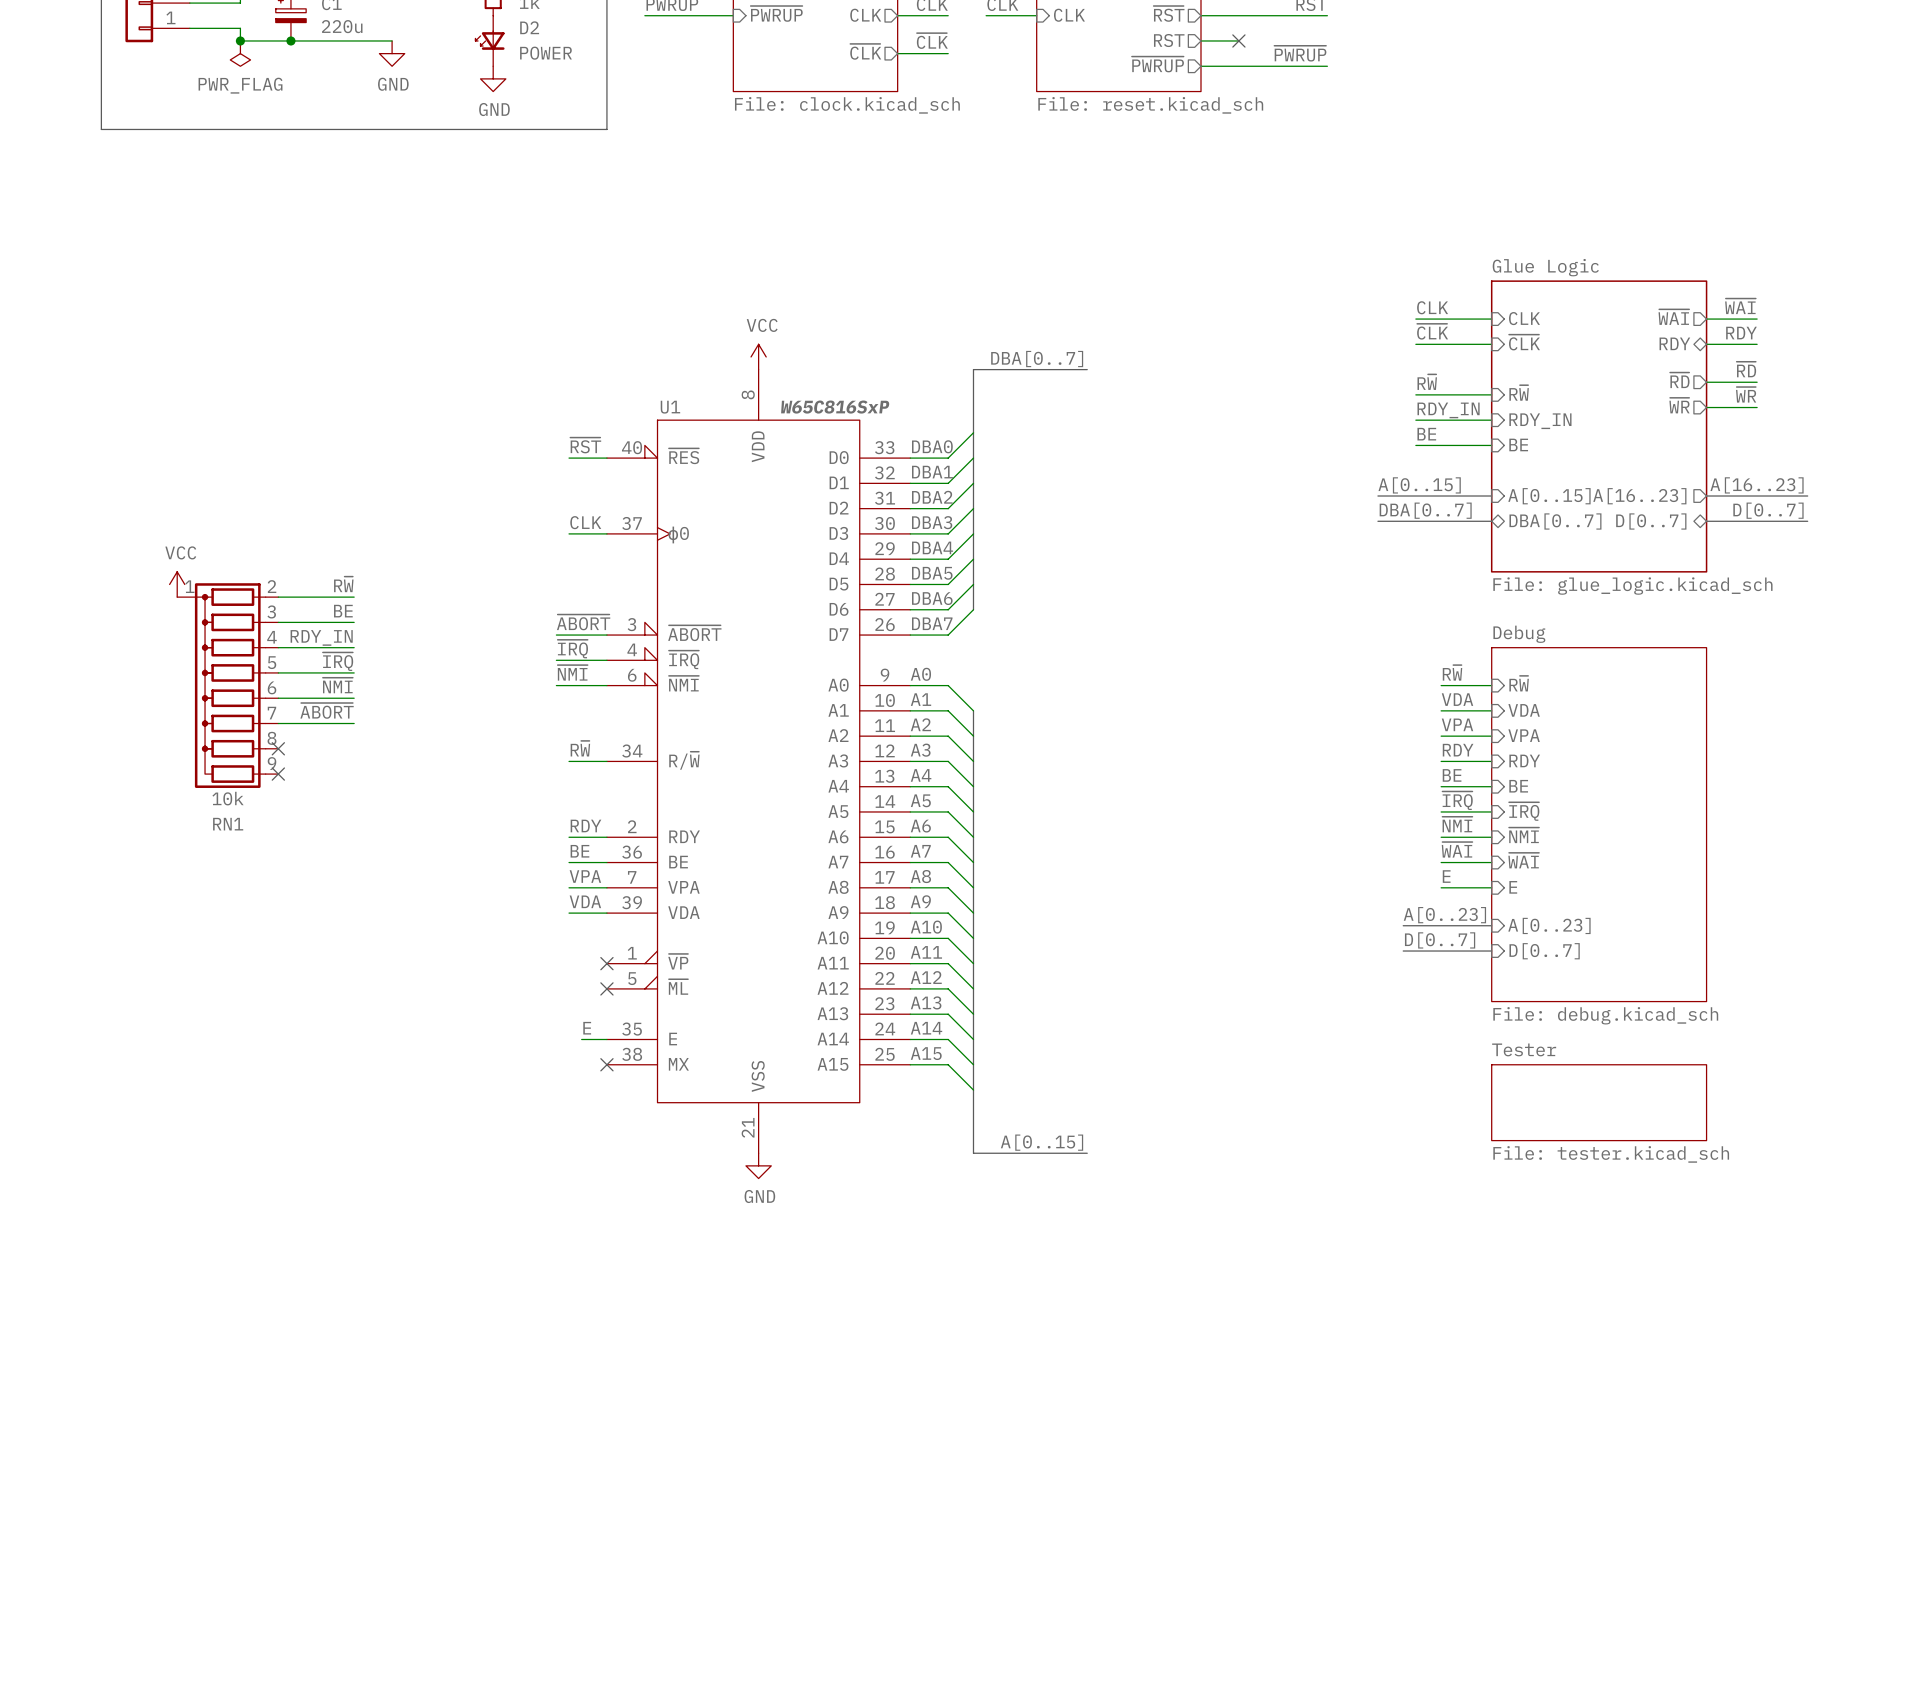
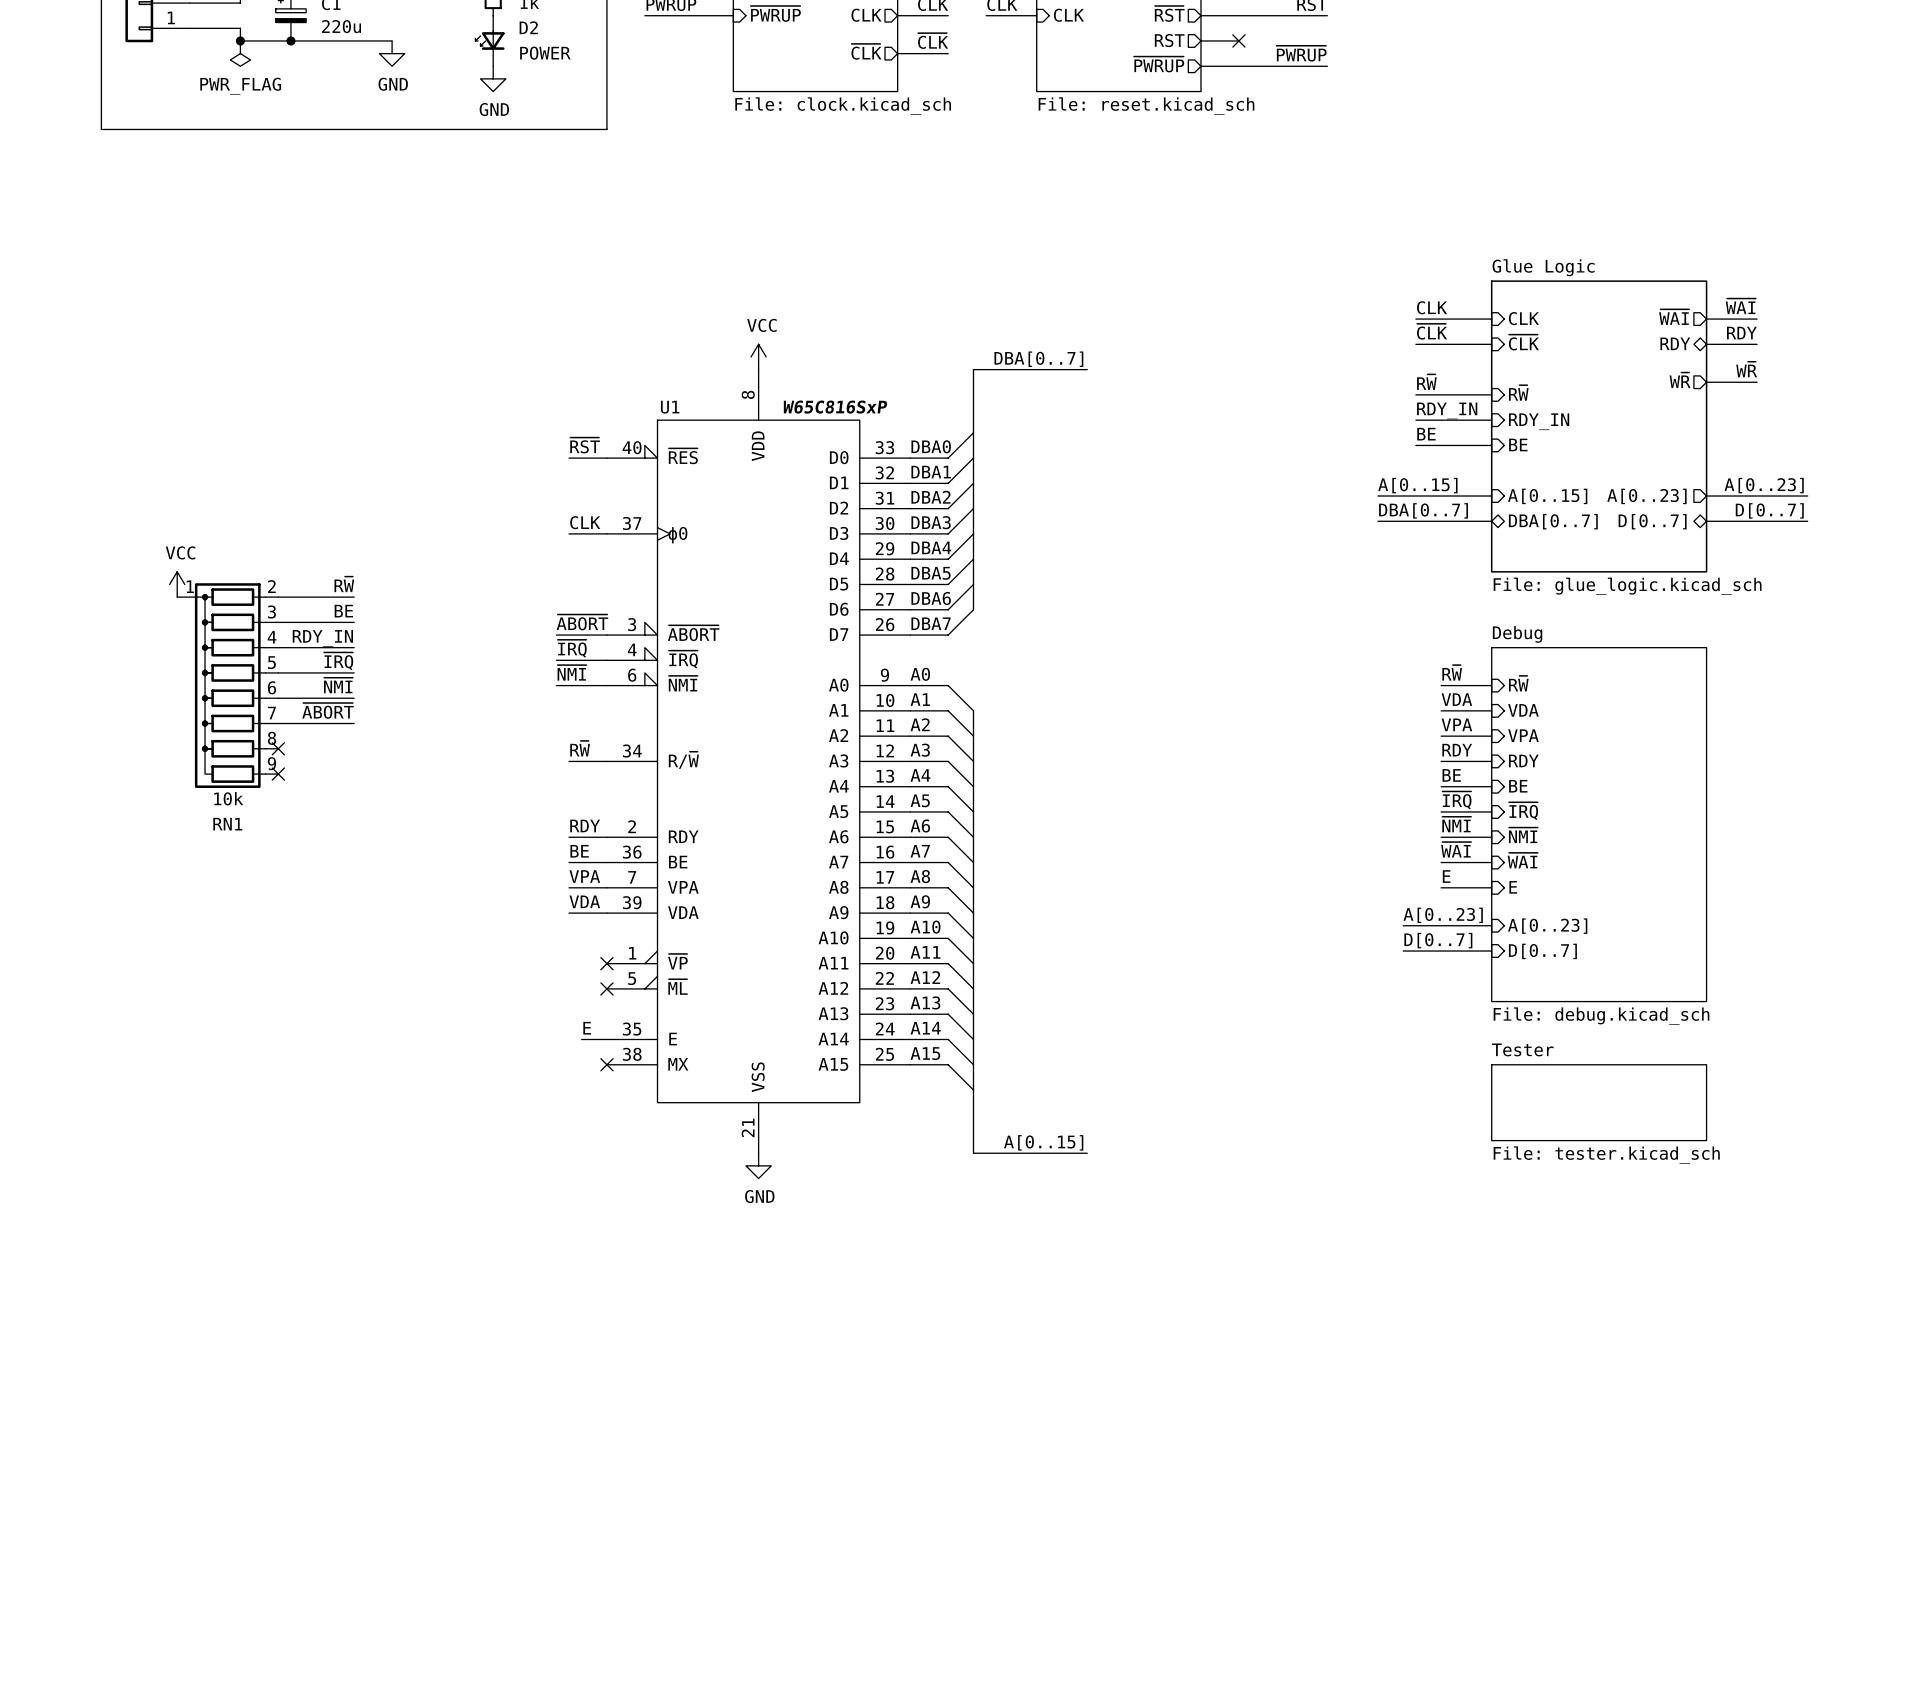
label: ~{RD} (1746, 369) -> W~{R} (1746, 369)
sheet pin: ~{RD} (1679, 380) -> W~{R} (1680, 380)
label: ~{WR} (1746, 394) -> none
sheet pin: ~{WR} (1679, 405) -> none
wire: (1706, 407) (1757, 407) -> none
label: A[16..23] (1757, 485) -> A[0..23] (1764, 485)
sheet pin: A[16..23] (1639, 496) -> A[0..23] (1646, 496)

